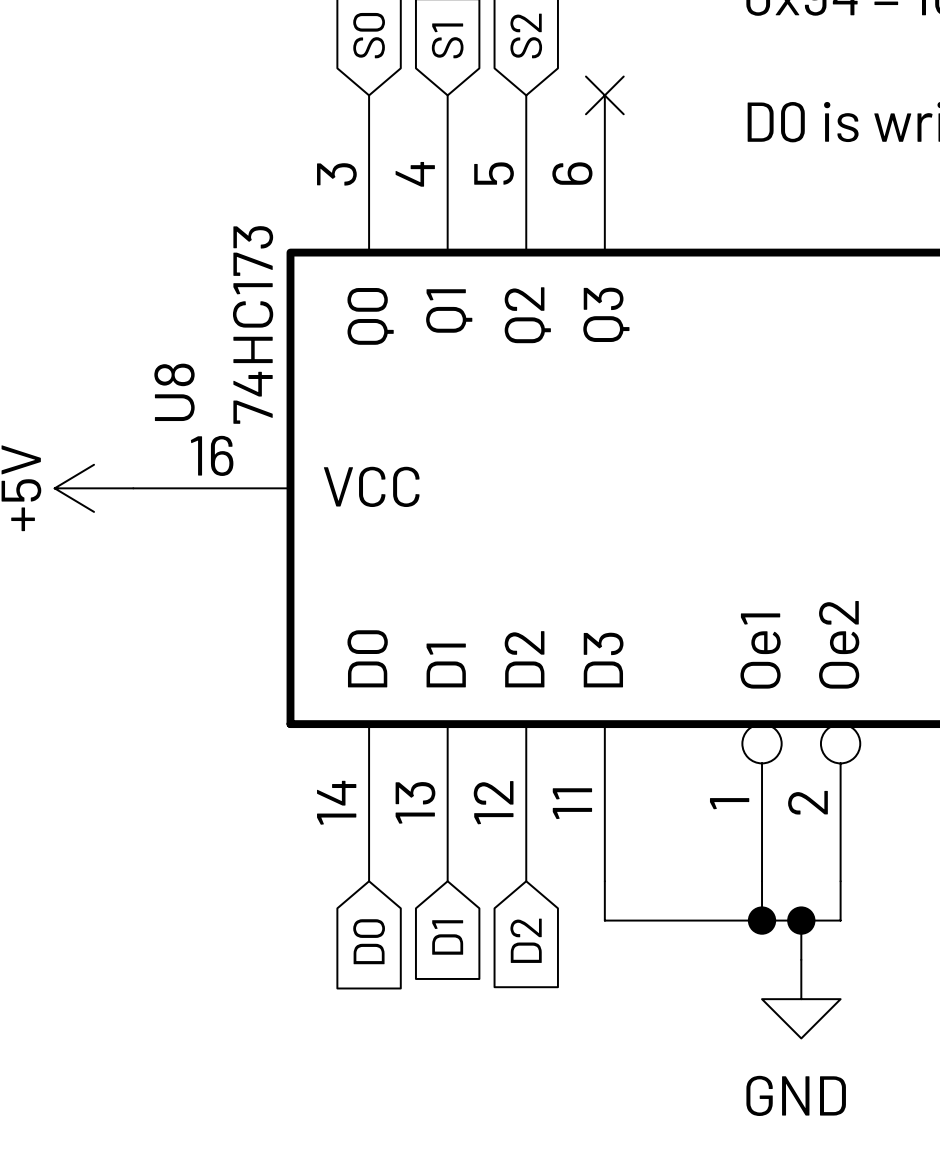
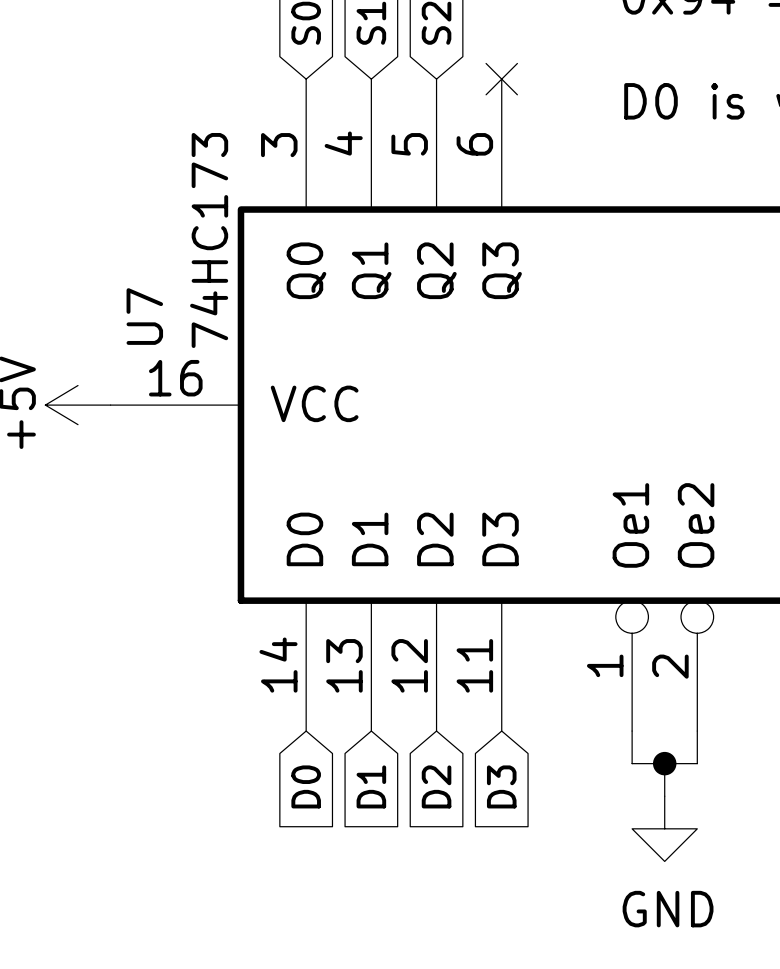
U8 name: U8 (174, 392) -> U7 (144, 316)
wire: (604, 881) (604, 920) (762, 920) -> none
junction: (762, 920) -> none
global label: none -> D3 (501, 786)

